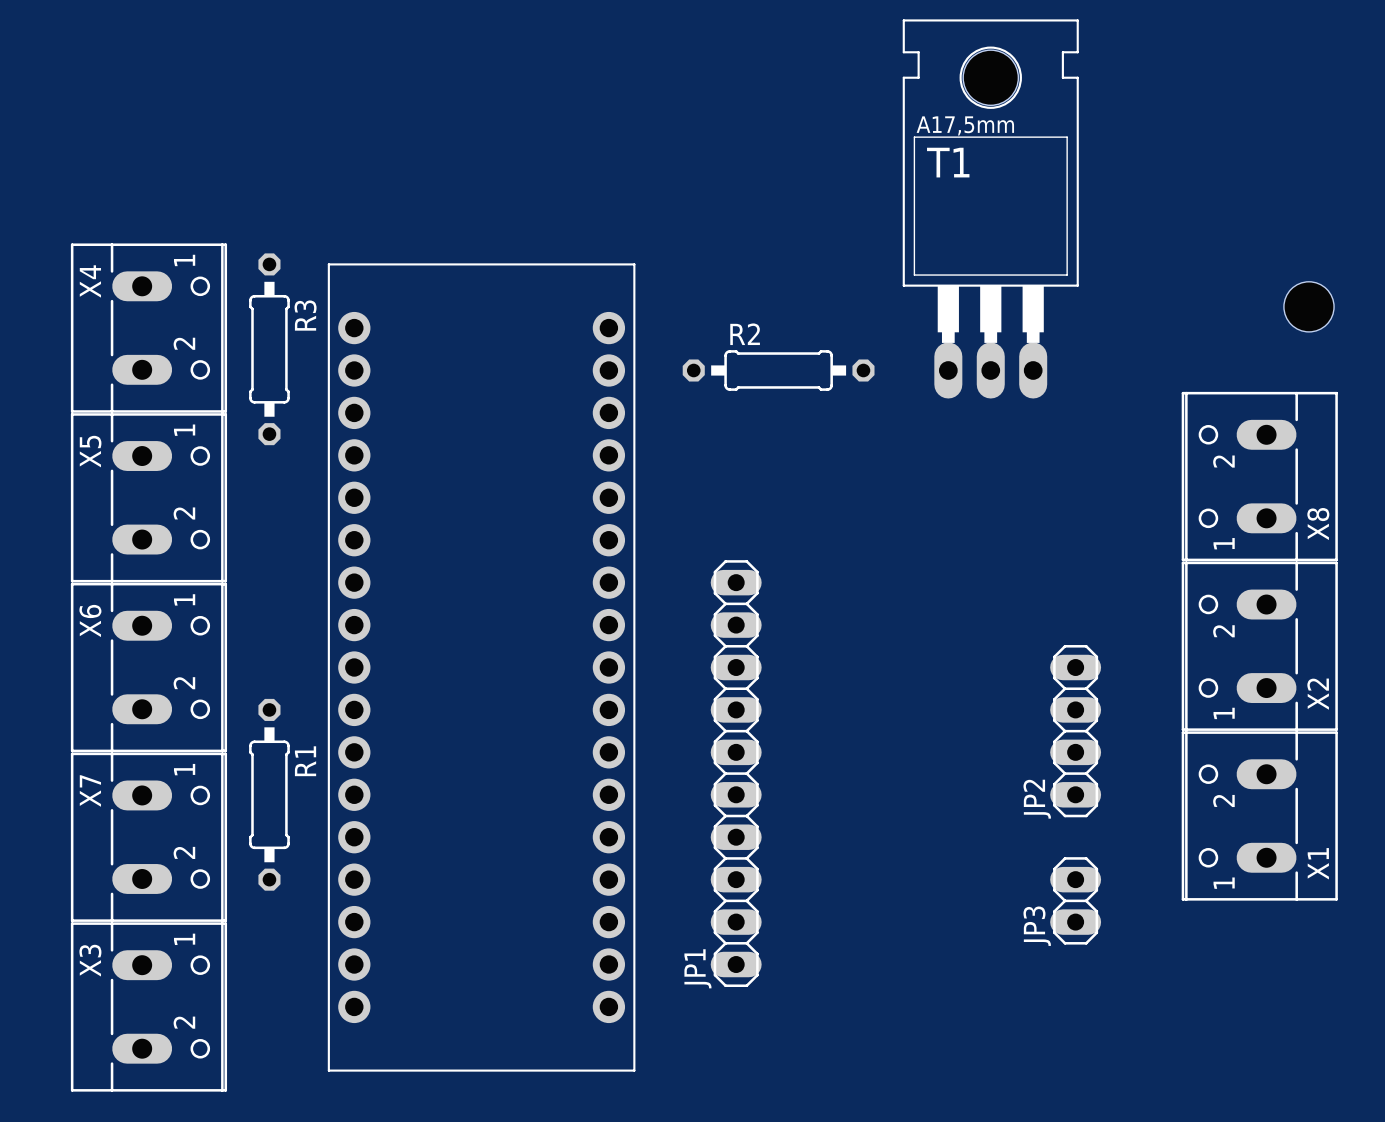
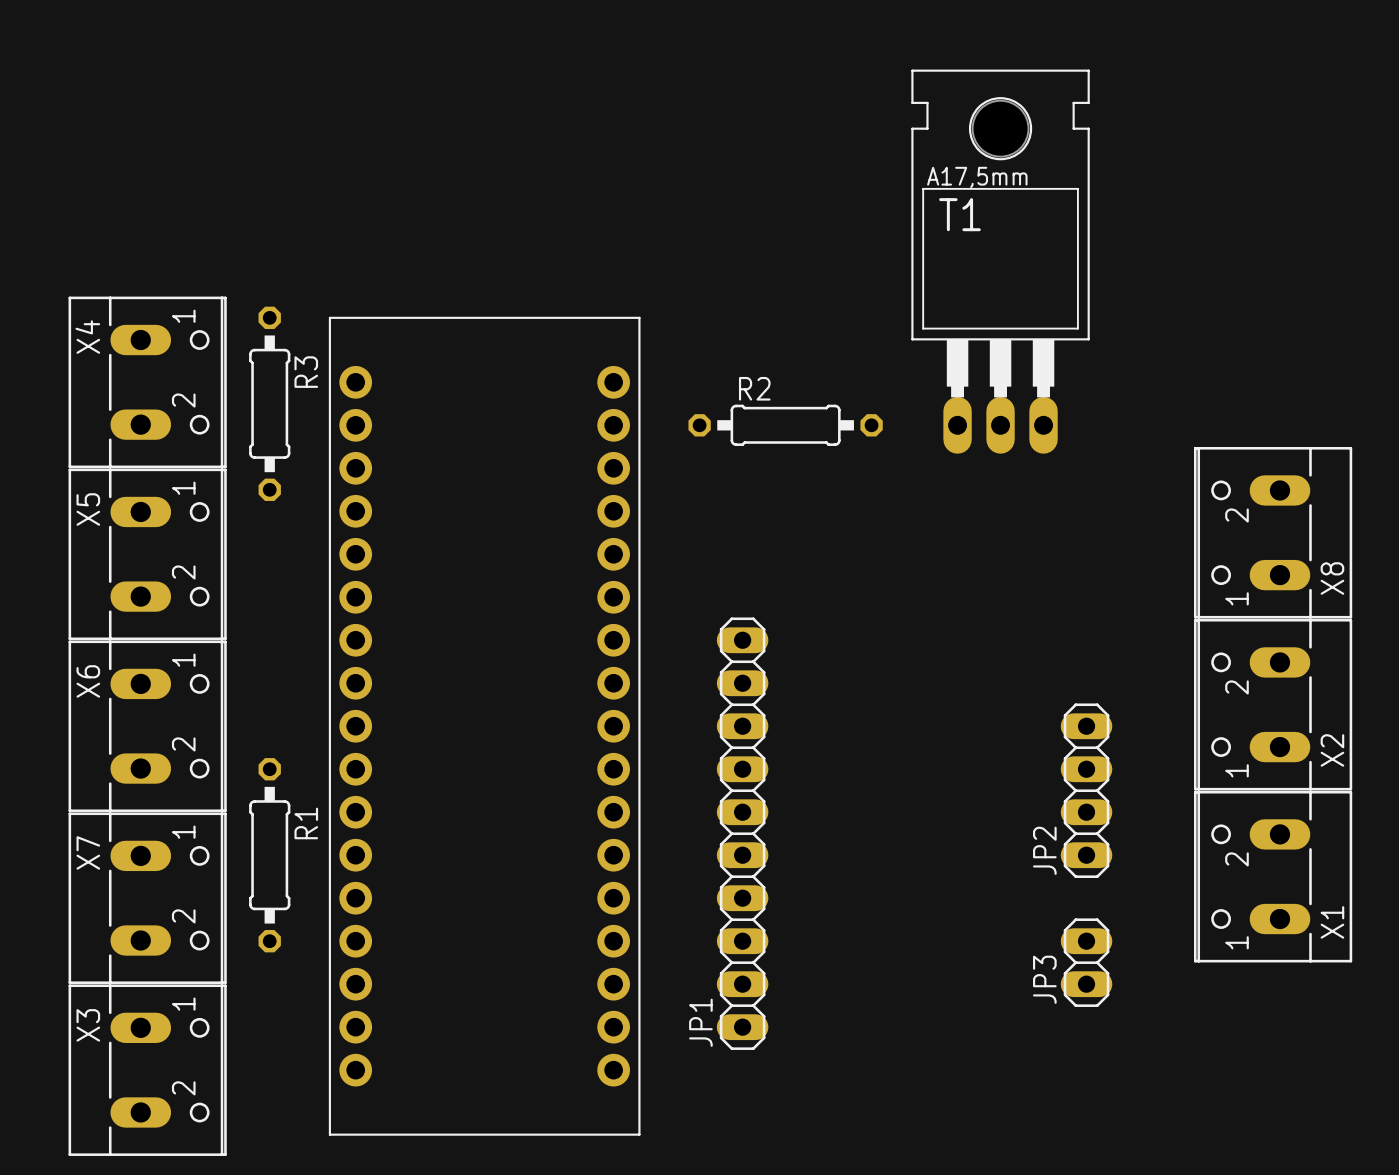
hole: (1308, 306) -> none

